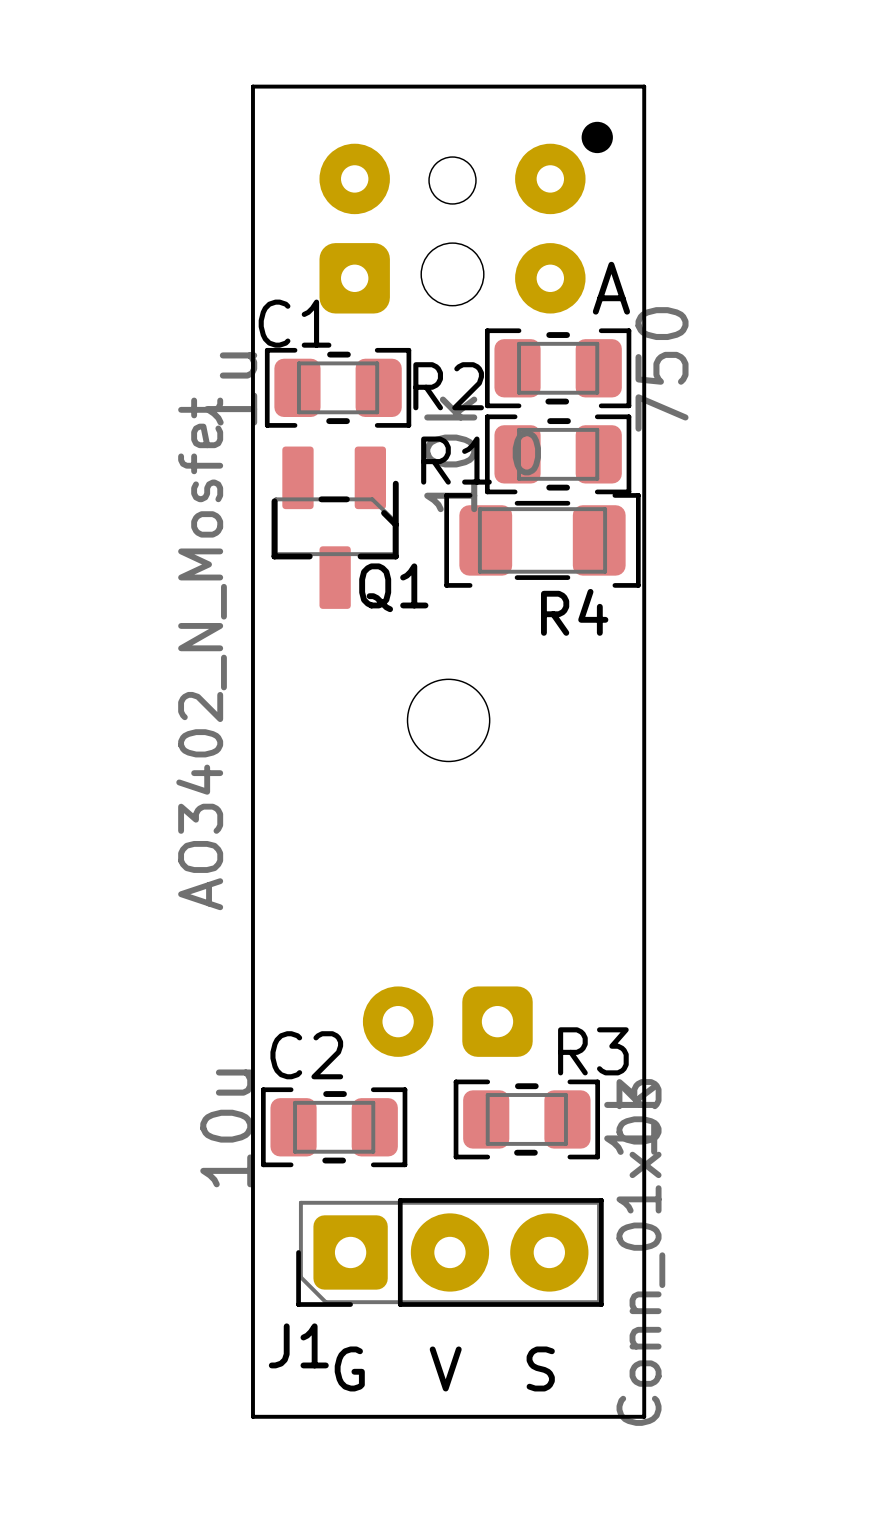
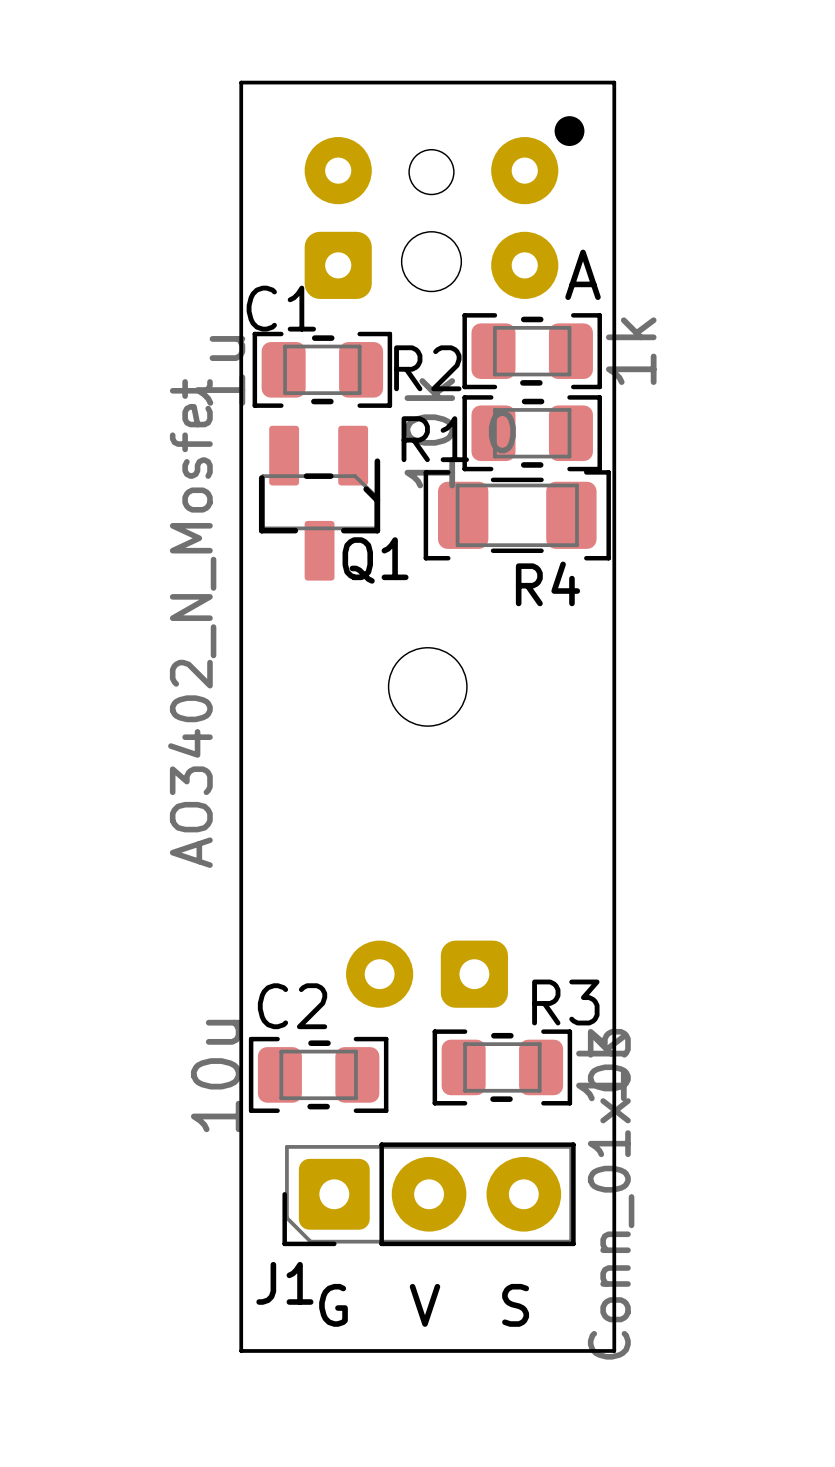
R1 value: 750 (662, 369) -> 1k (631, 351)

